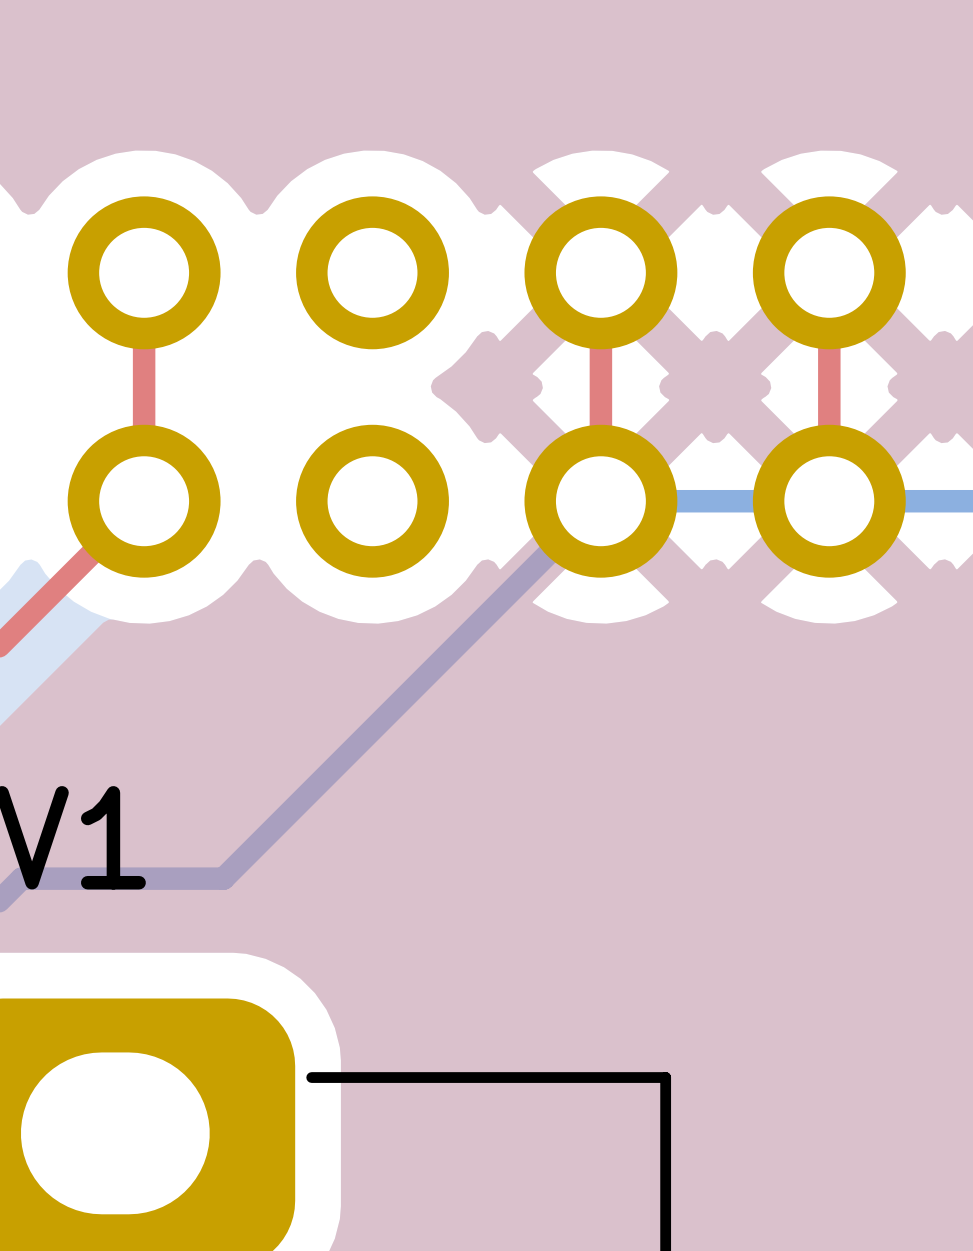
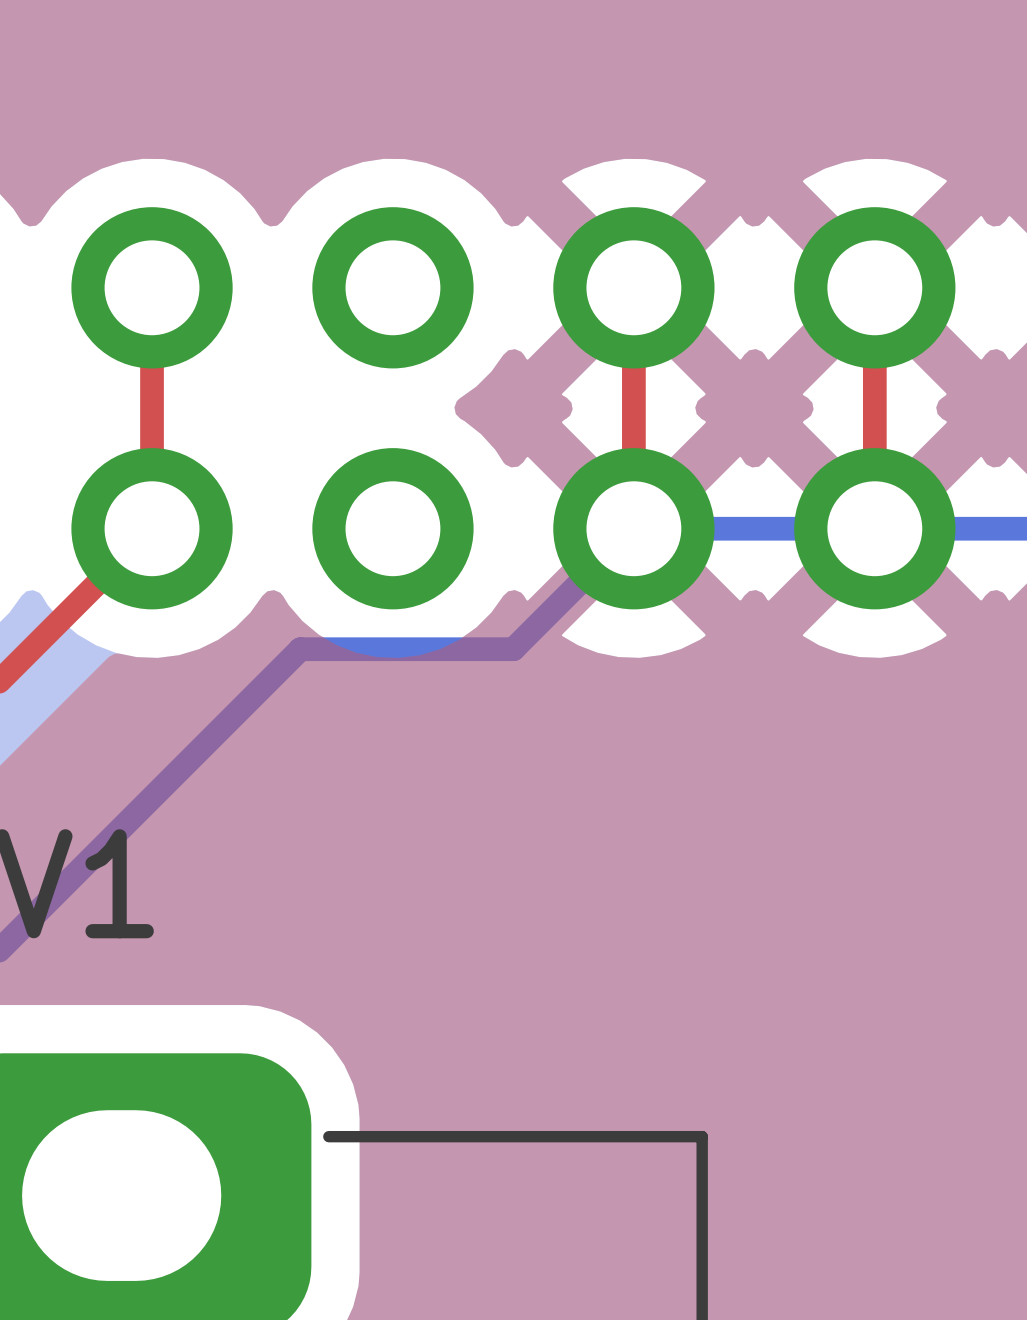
bottom track: (486, 615) (223, 878) (21, 878) -> (513, 649) (300, 649) (22, 926)

